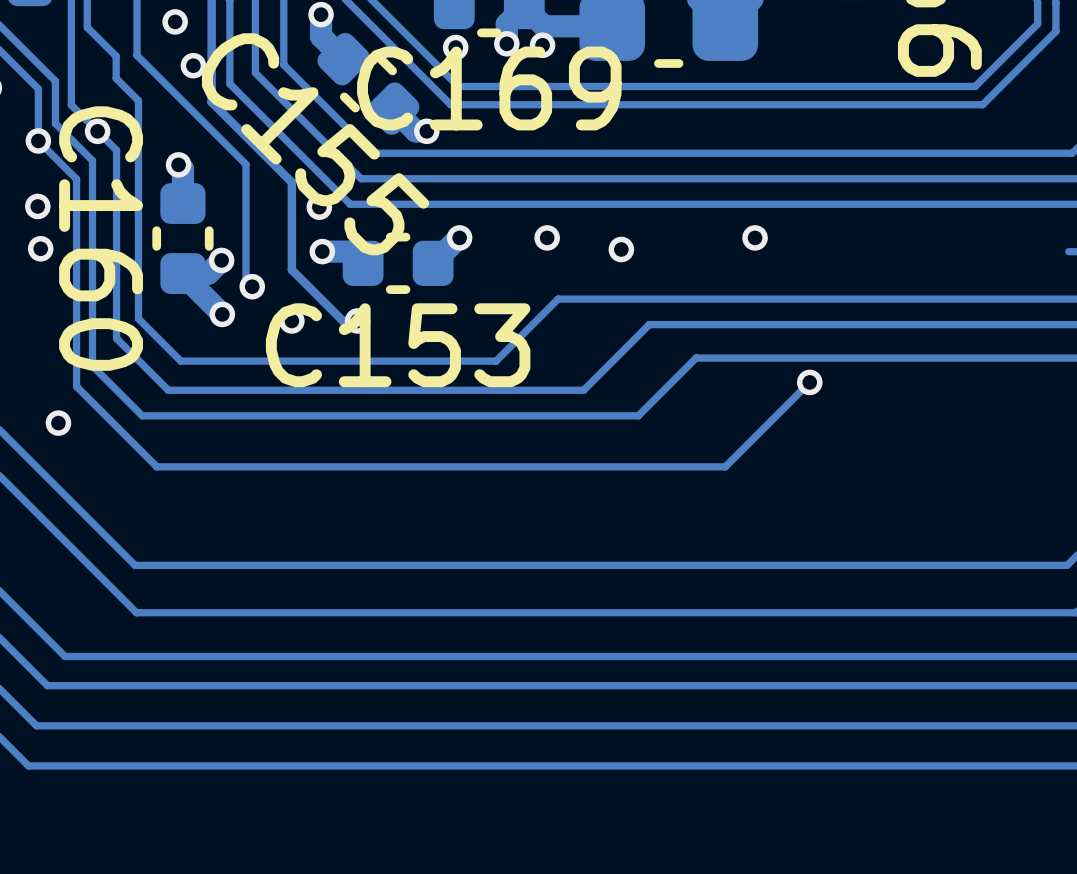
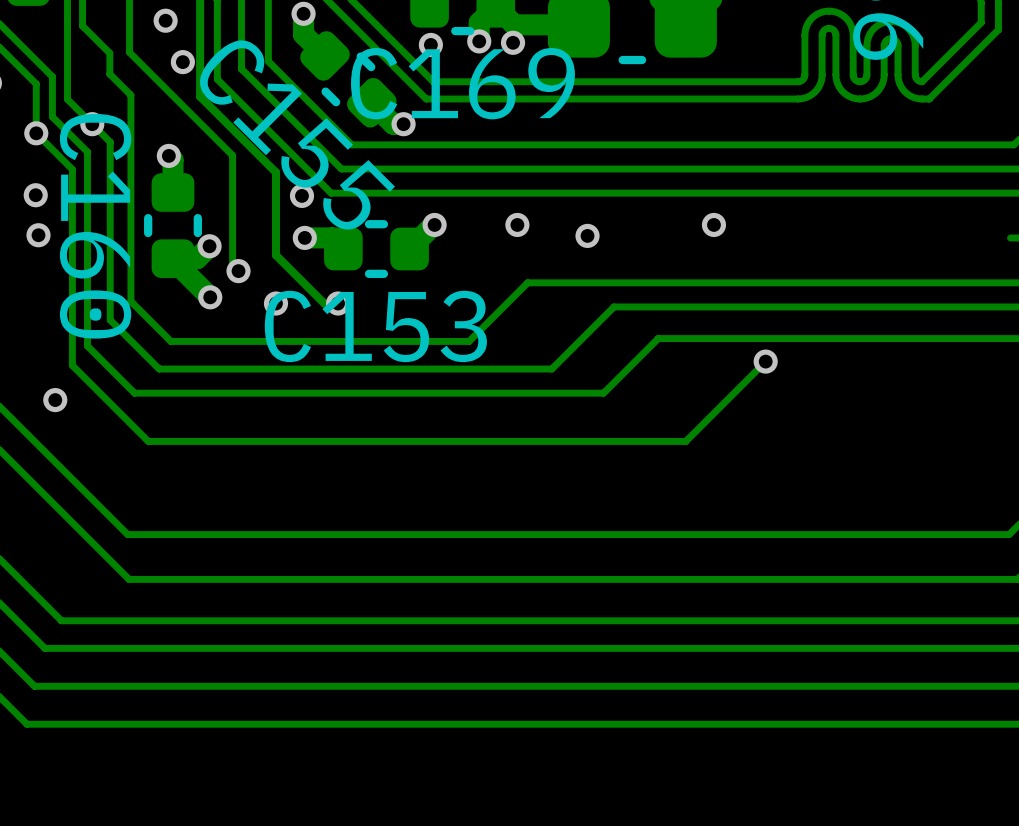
track: (975, 86) (843, 86) -> (922, 81) (917, 80) (915, 76) (915, 42) (912, 33) (903, 24) (891, 21) (879, 24) (870, 33) (867, 42) (866, 77) (862, 81) (855, 80) (853, 75) (851, 26) (843, 16) (829, 11) (816, 14) (806, 26) (804, 75) (802, 79) (797, 81)
track: (975, 104) (843, 104) -> (922, 99) (910, 95) (901, 86) (898, 78) (897, 44) (891, 38) (886, 40) (884, 44) (883, 78) (879, 89) (872, 95) (863, 98) (853, 98) (845, 94) (836, 81) (835, 34) (833, 30) (829, 28) (824, 29) (822, 34) (820, 84) (810, 95) (797, 99)

